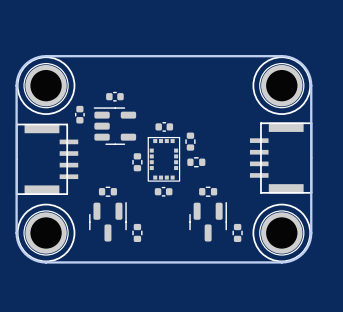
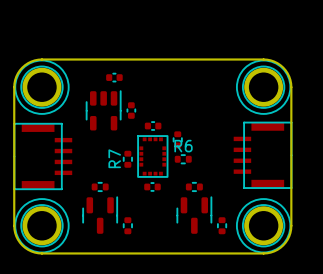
part: none -> (114, 77)
part: (114, 96) -> none
part: none -> (131, 110)
part: (79, 114) -> none
part rotation: 0° (114, 126) -> 90° clockwise (103, 110)
R6 name: none -> R6 (183, 146)
R7 name: none -> R7 (114, 158)

